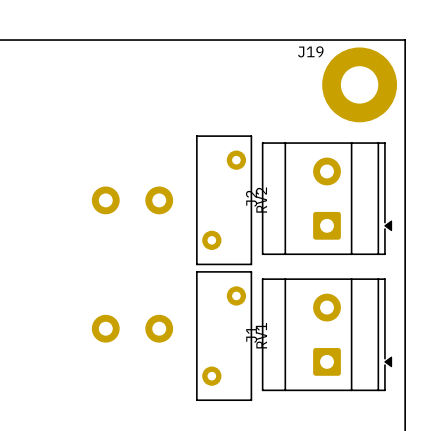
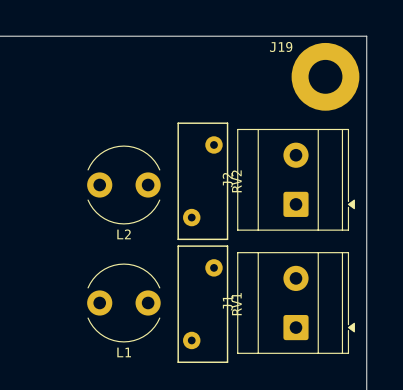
L2 side: bottom (132, 200) -> top (123, 184)
L1 side: bottom (132, 328) -> top (123, 302)

